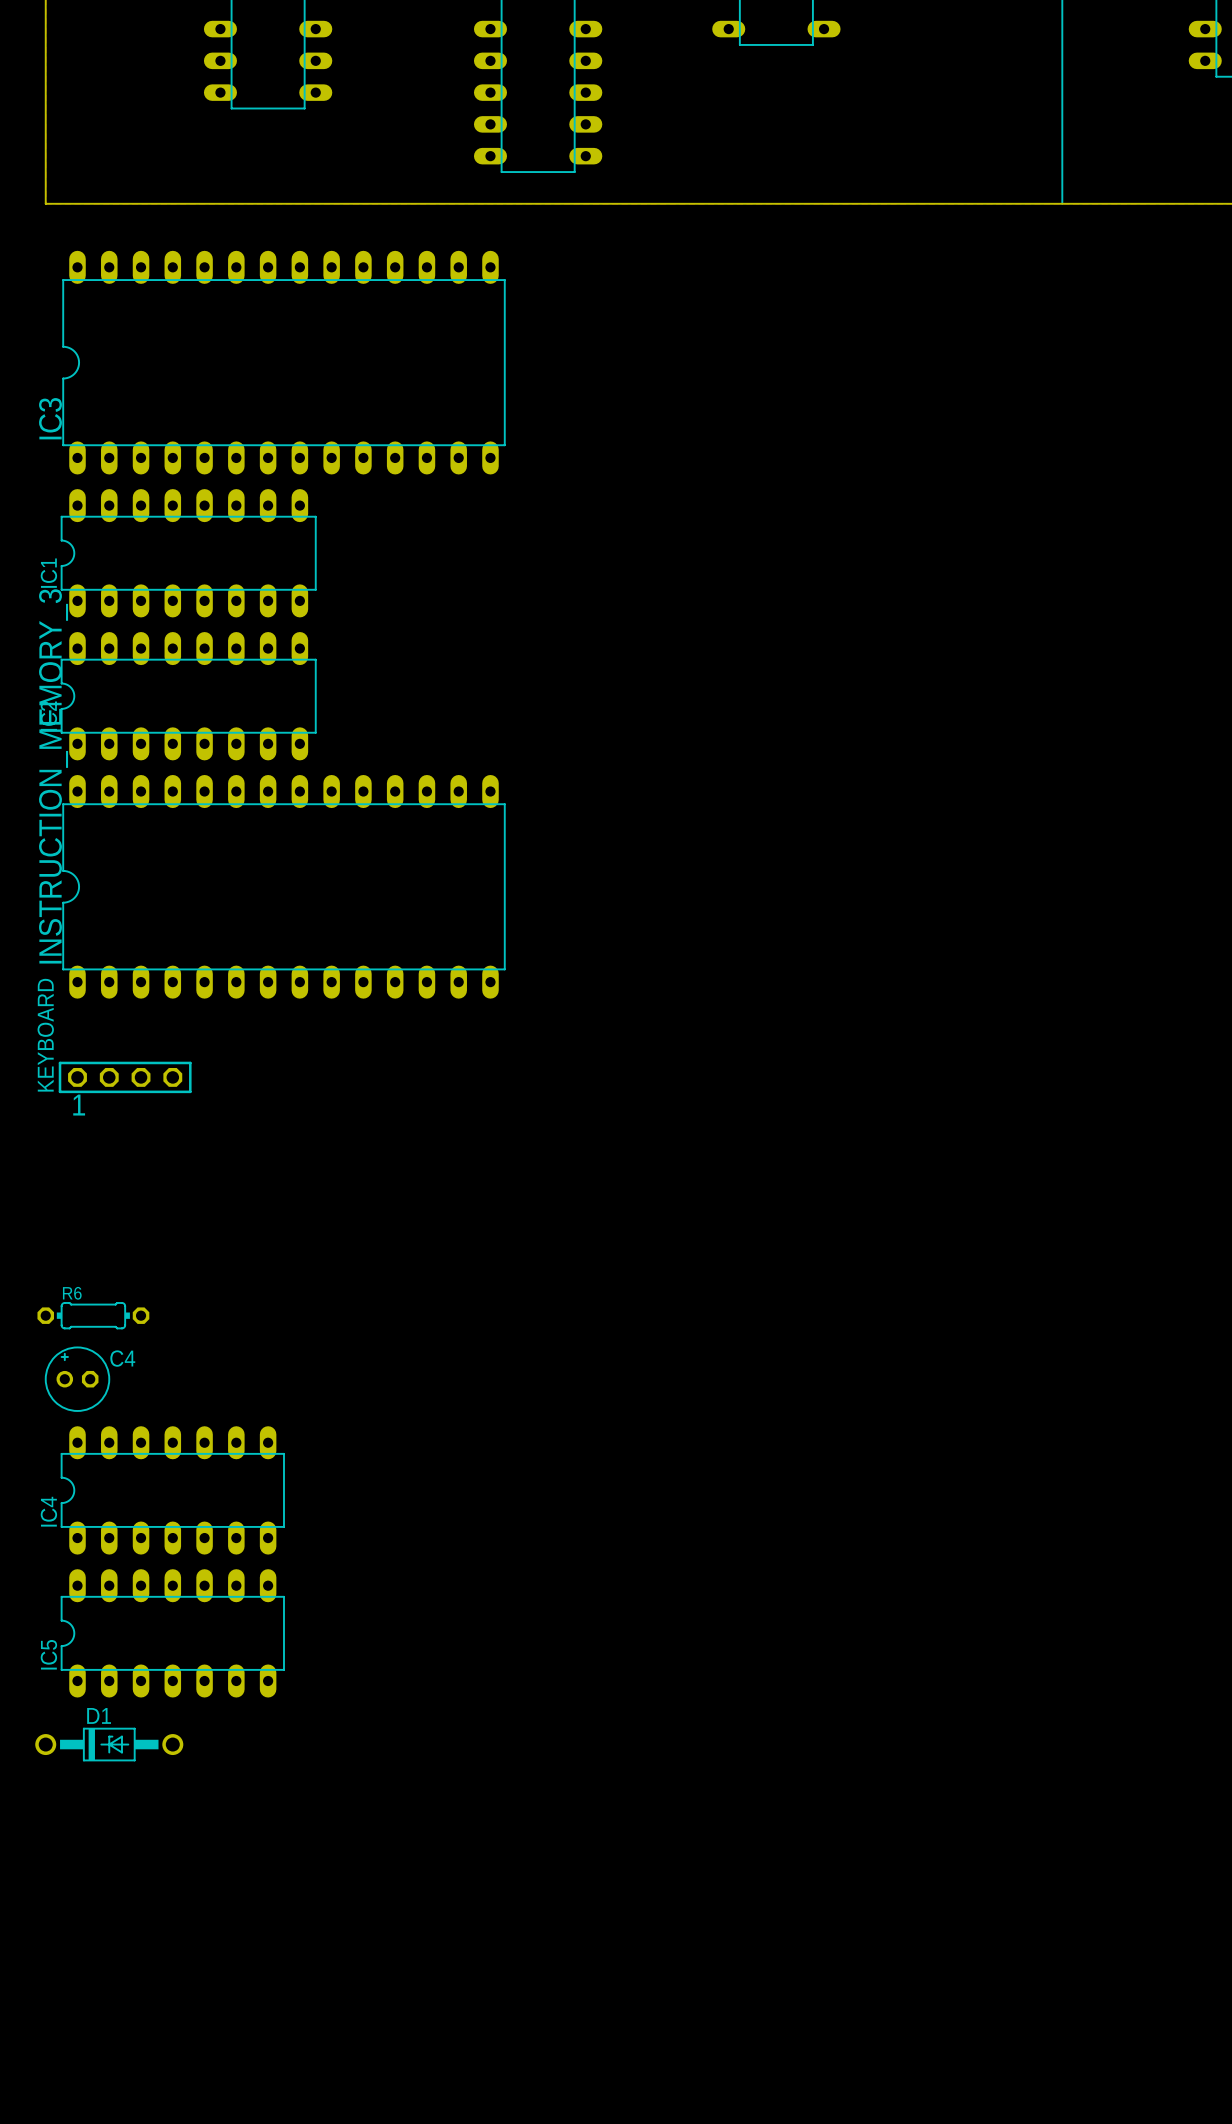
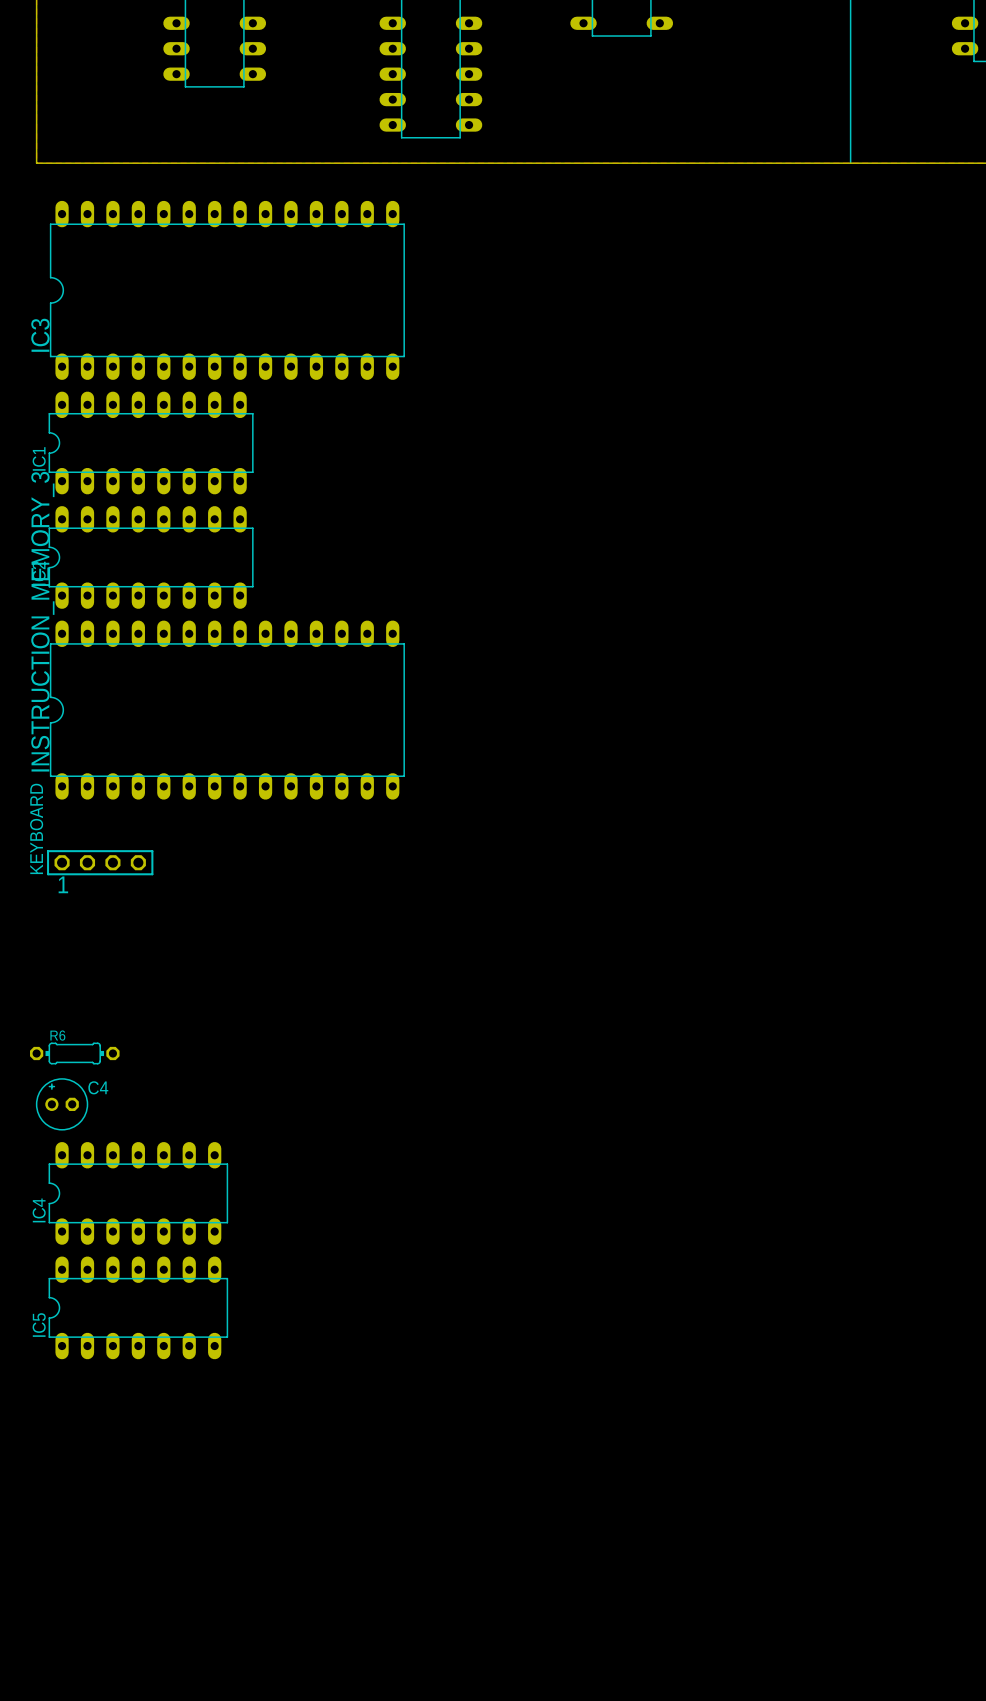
D1: (109, 1744) -> none

